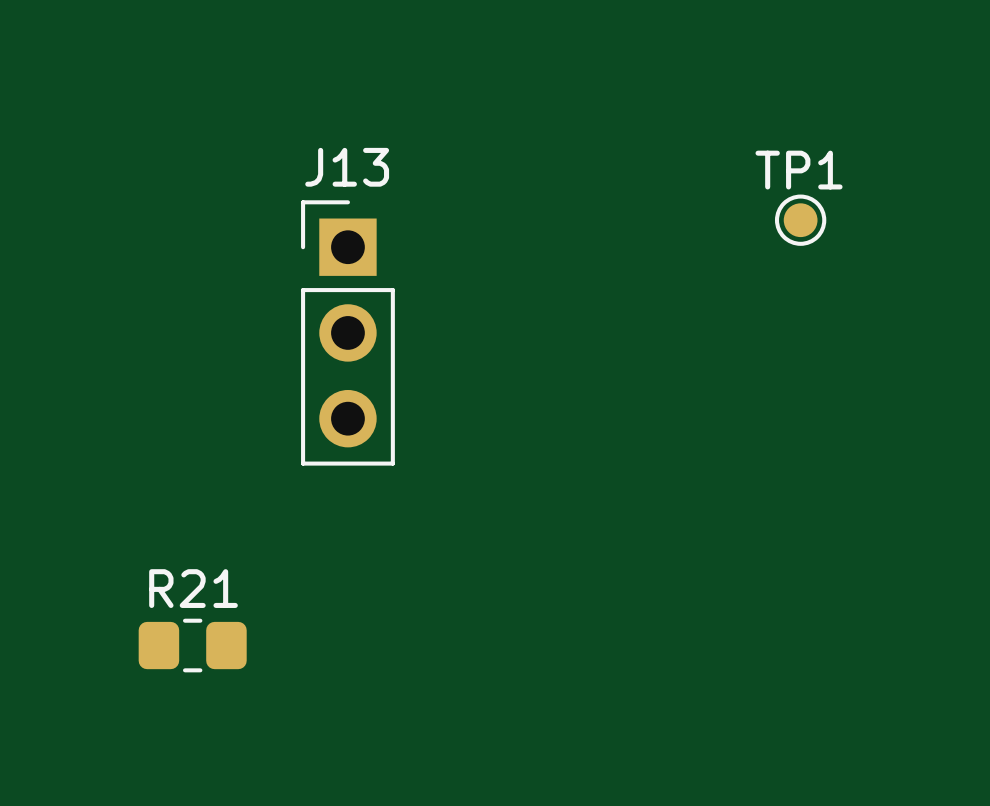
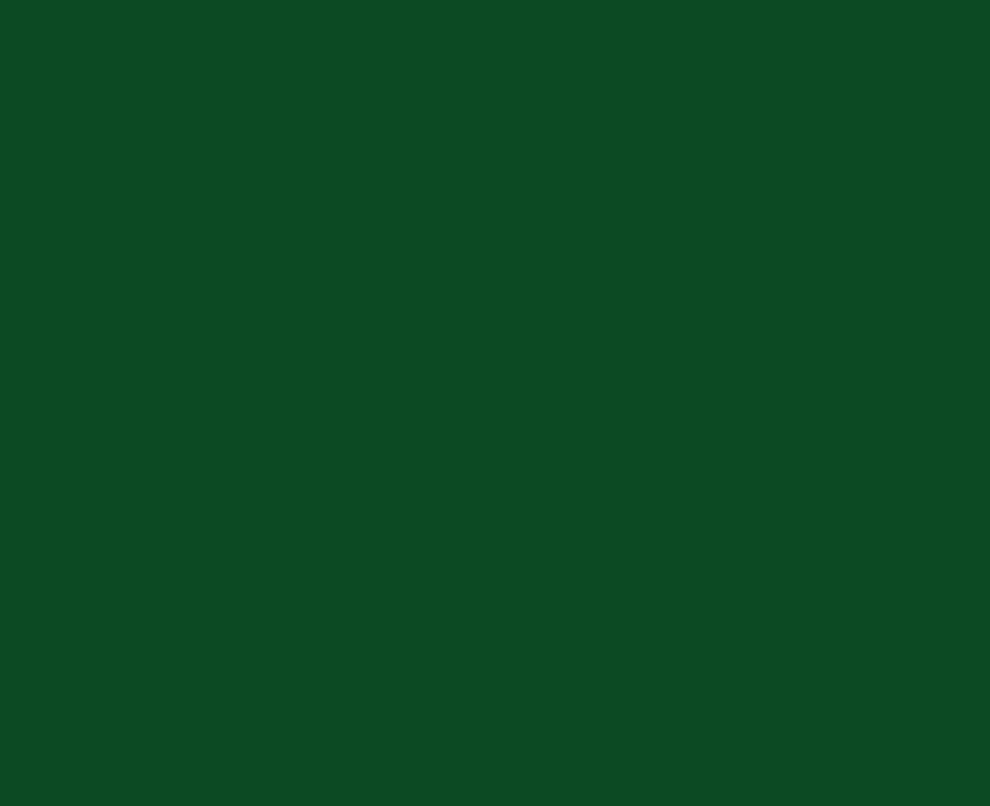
TP1: (800, 220) -> none
J13: (347, 332) -> none
R21: (192, 645) -> none

